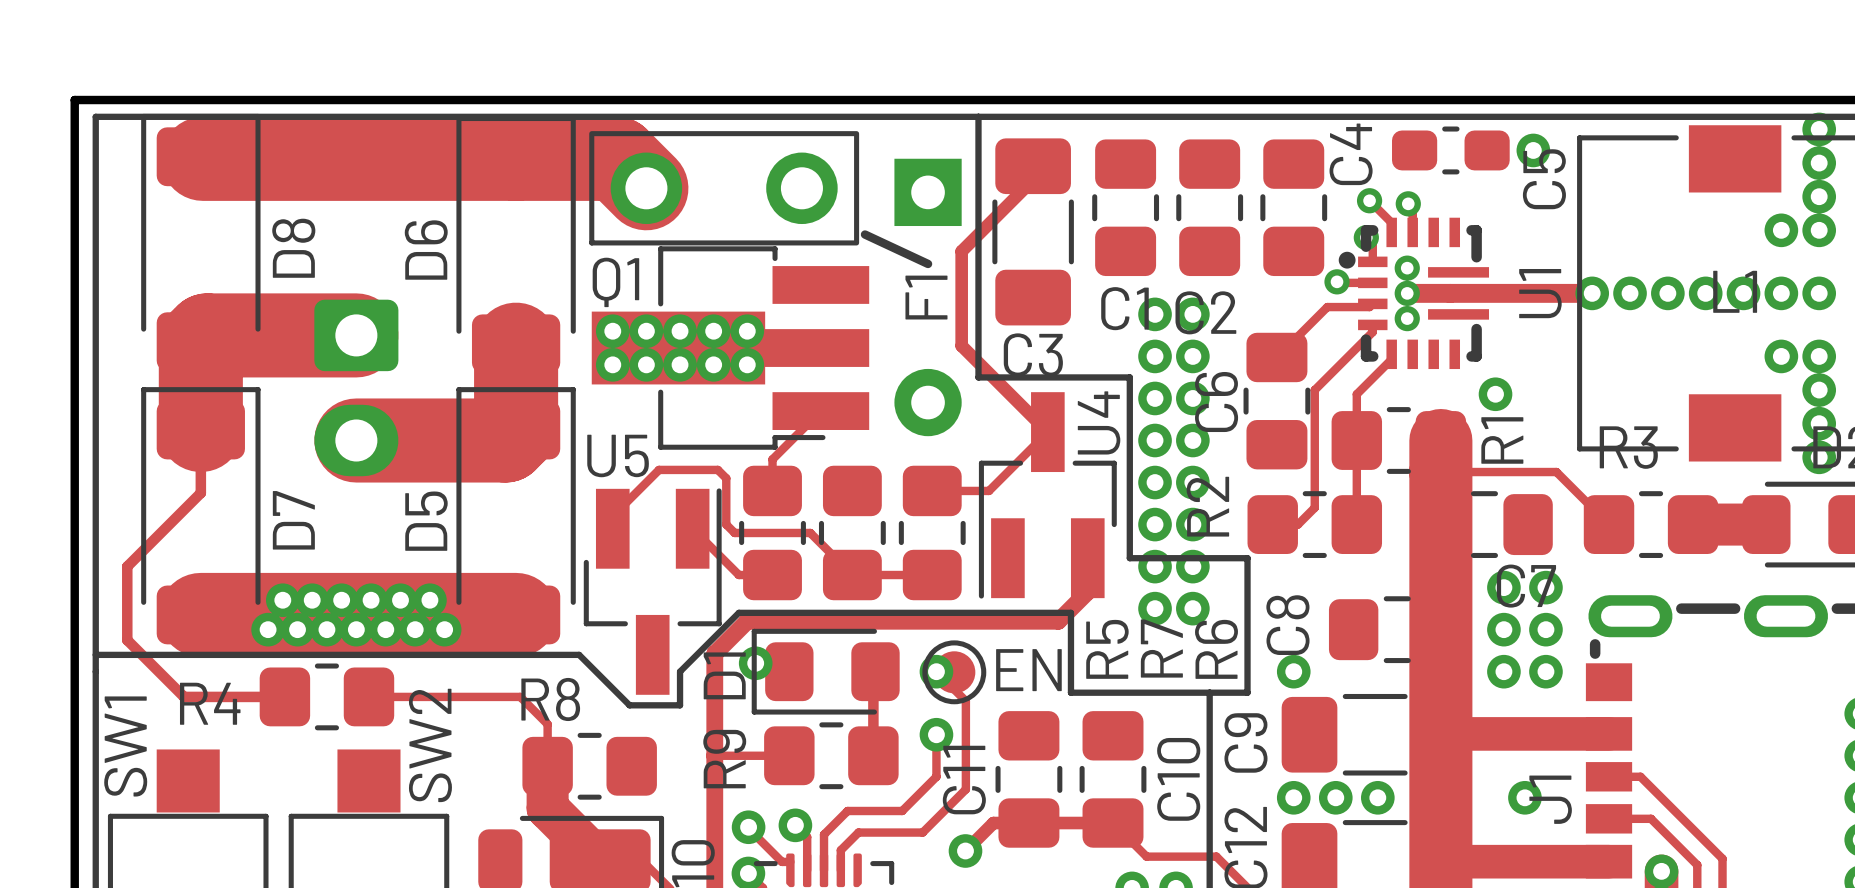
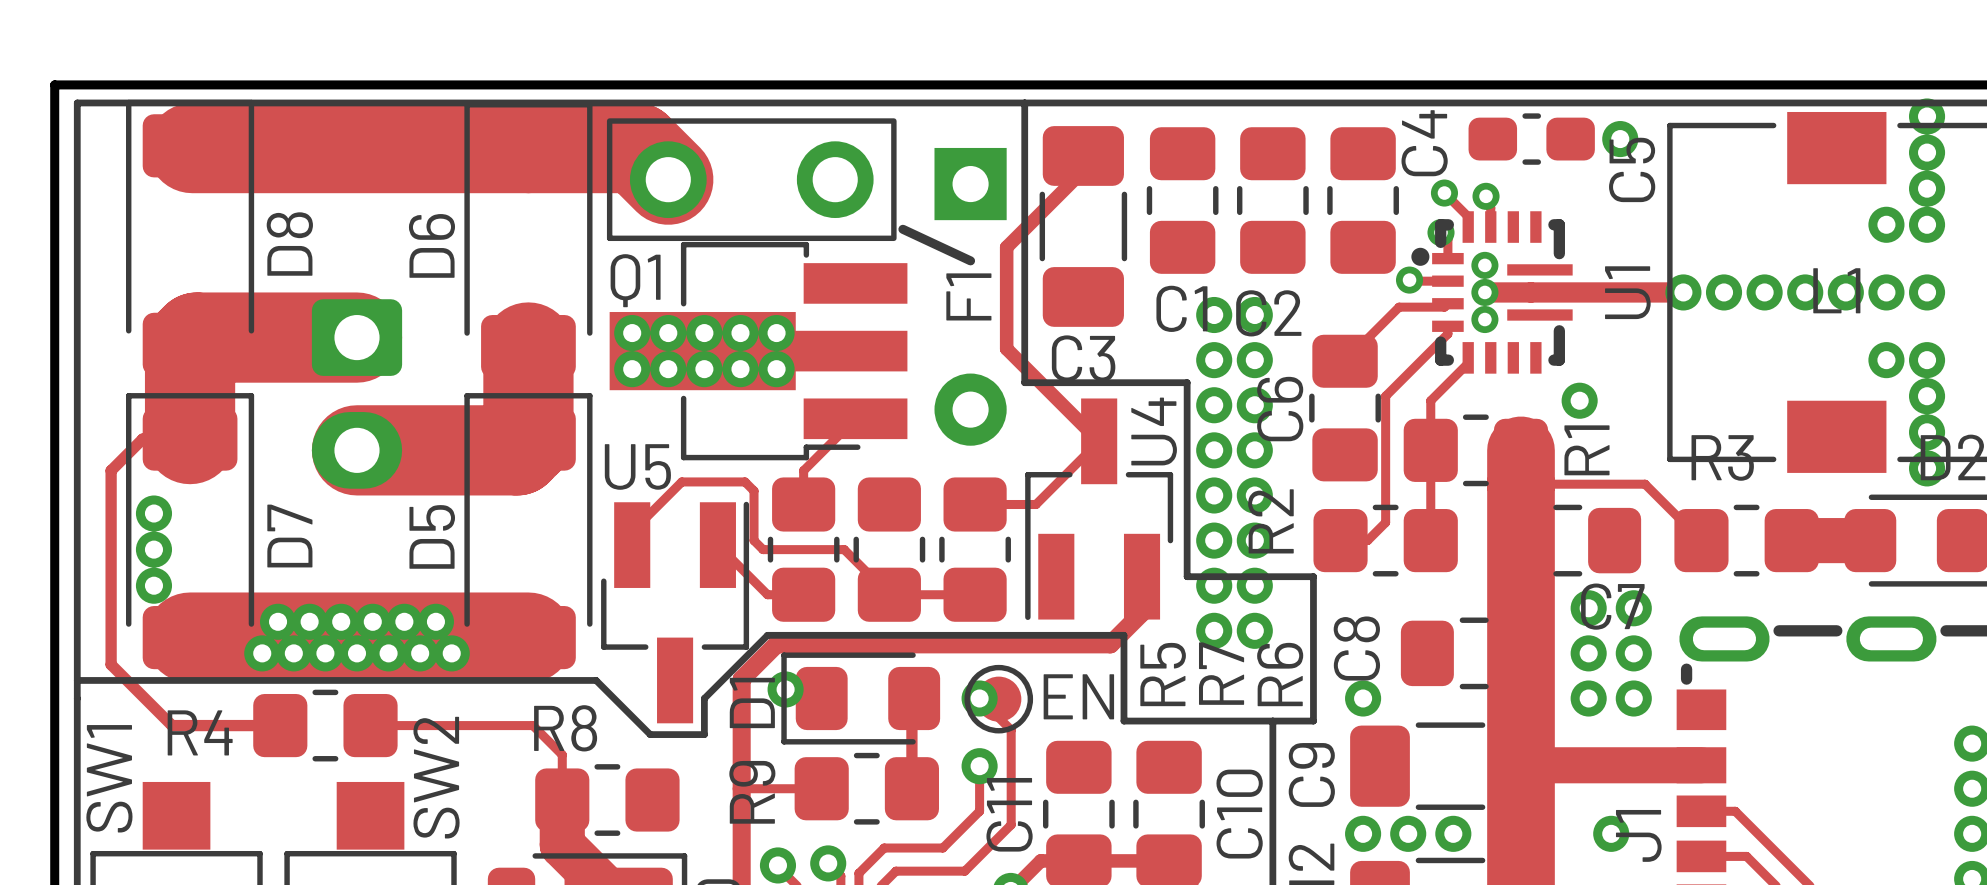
track: (200, 429) (200, 493) (127, 566) -> (190, 439) (142, 439) (111, 470) (111, 585)
via: none -> (153, 513)
via: none -> (153, 549)
via: none -> (153, 585)

